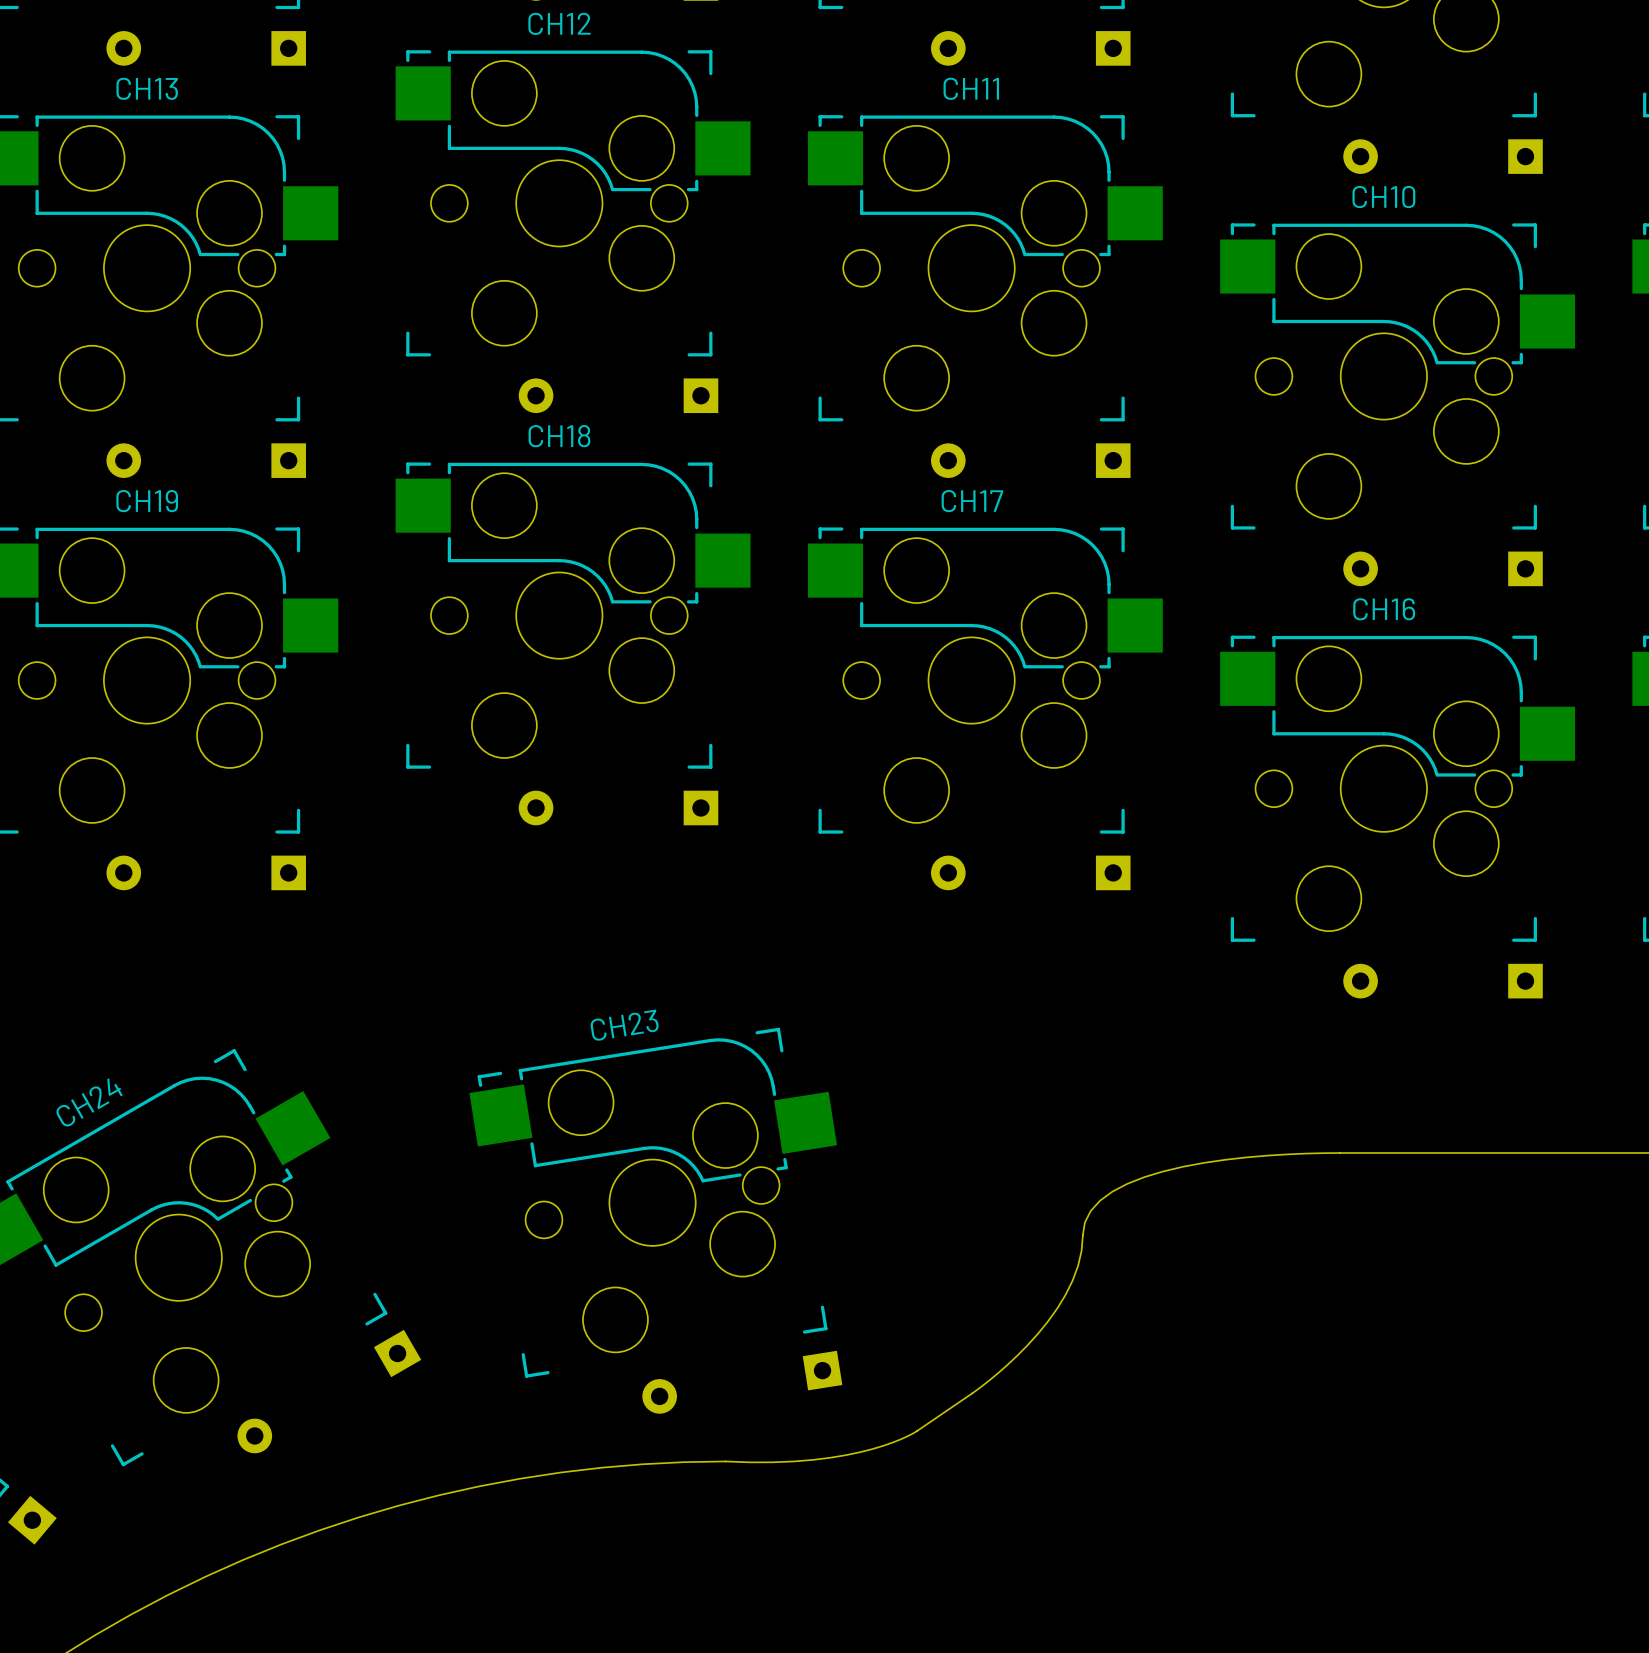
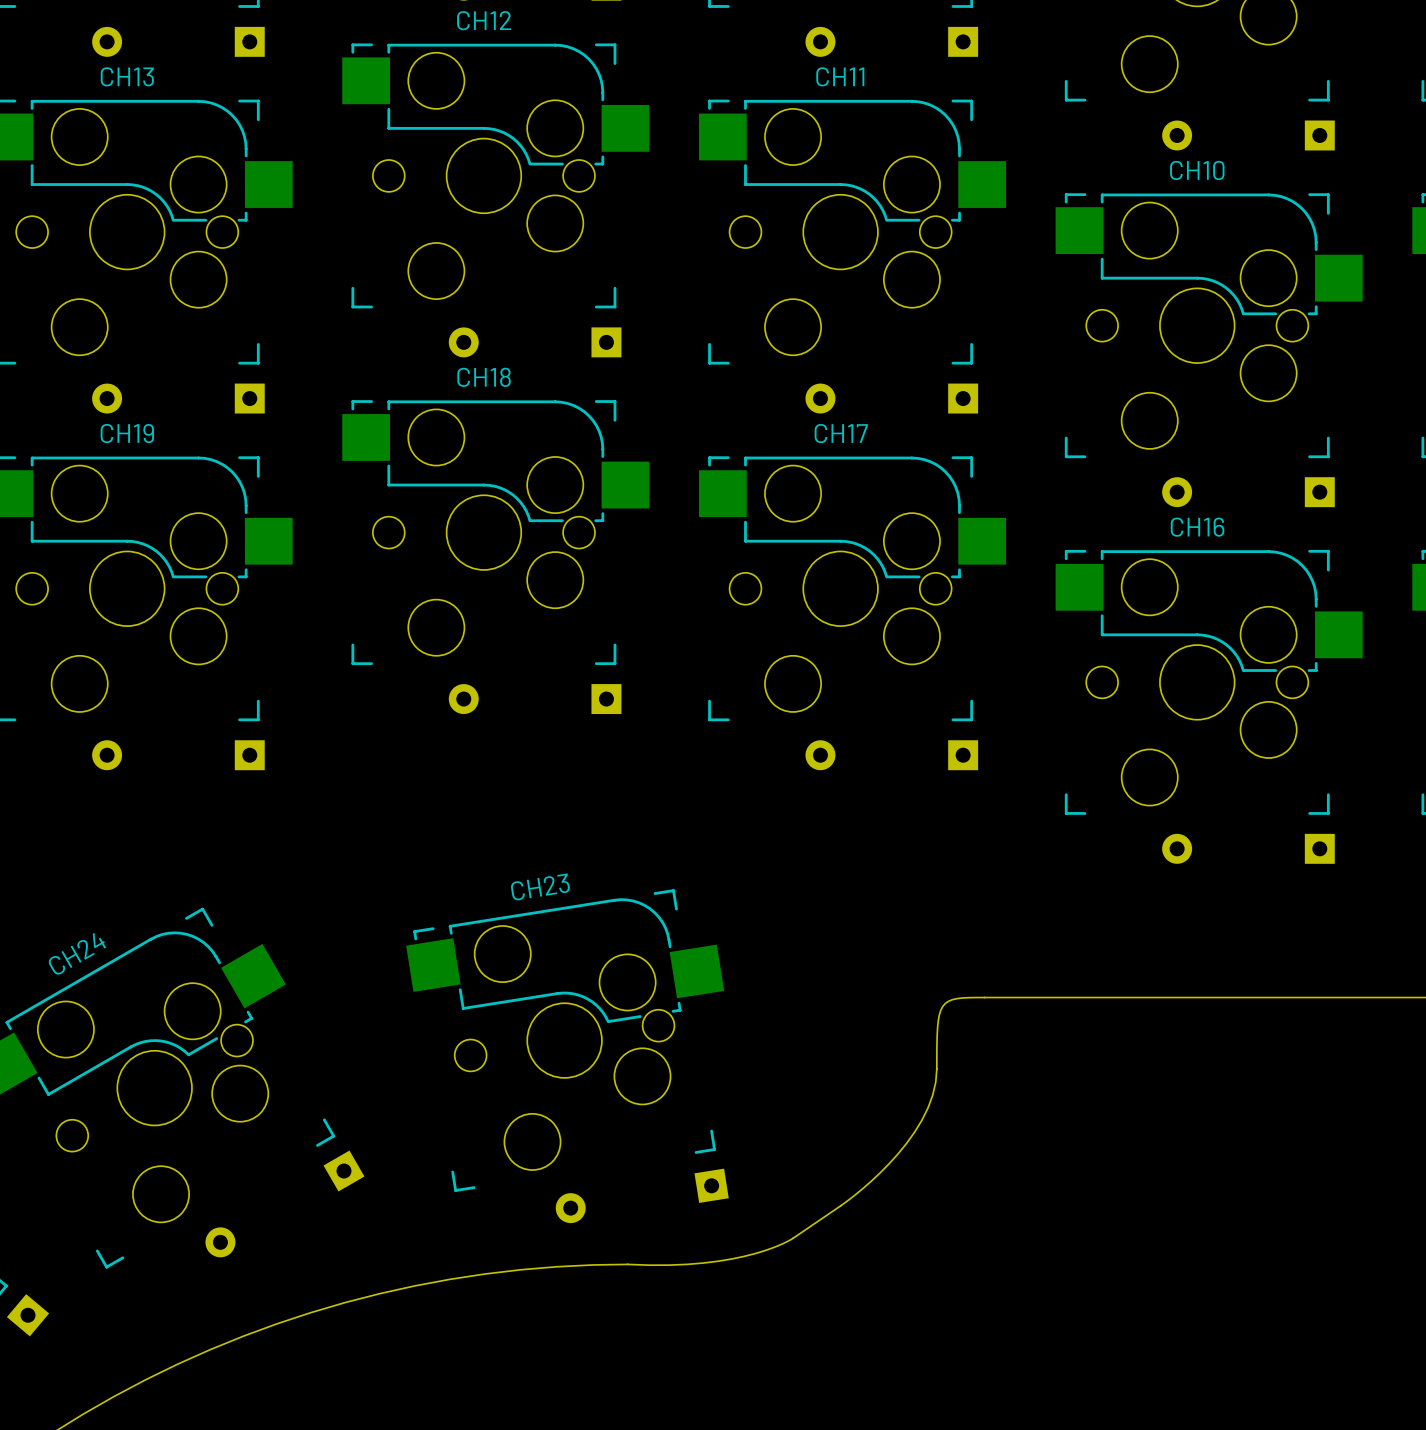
board edge: (1339, 1153) (1287, 1154) (1225, 1159) (1182, 1166) (1144, 1177) (1112, 1191) (1100, 1200) (1090, 1210) (1084, 1222) (1082, 1235) -> (1159, 997) (976, 997) (952, 999) (942, 1006) (939, 1014) (936, 1068)

